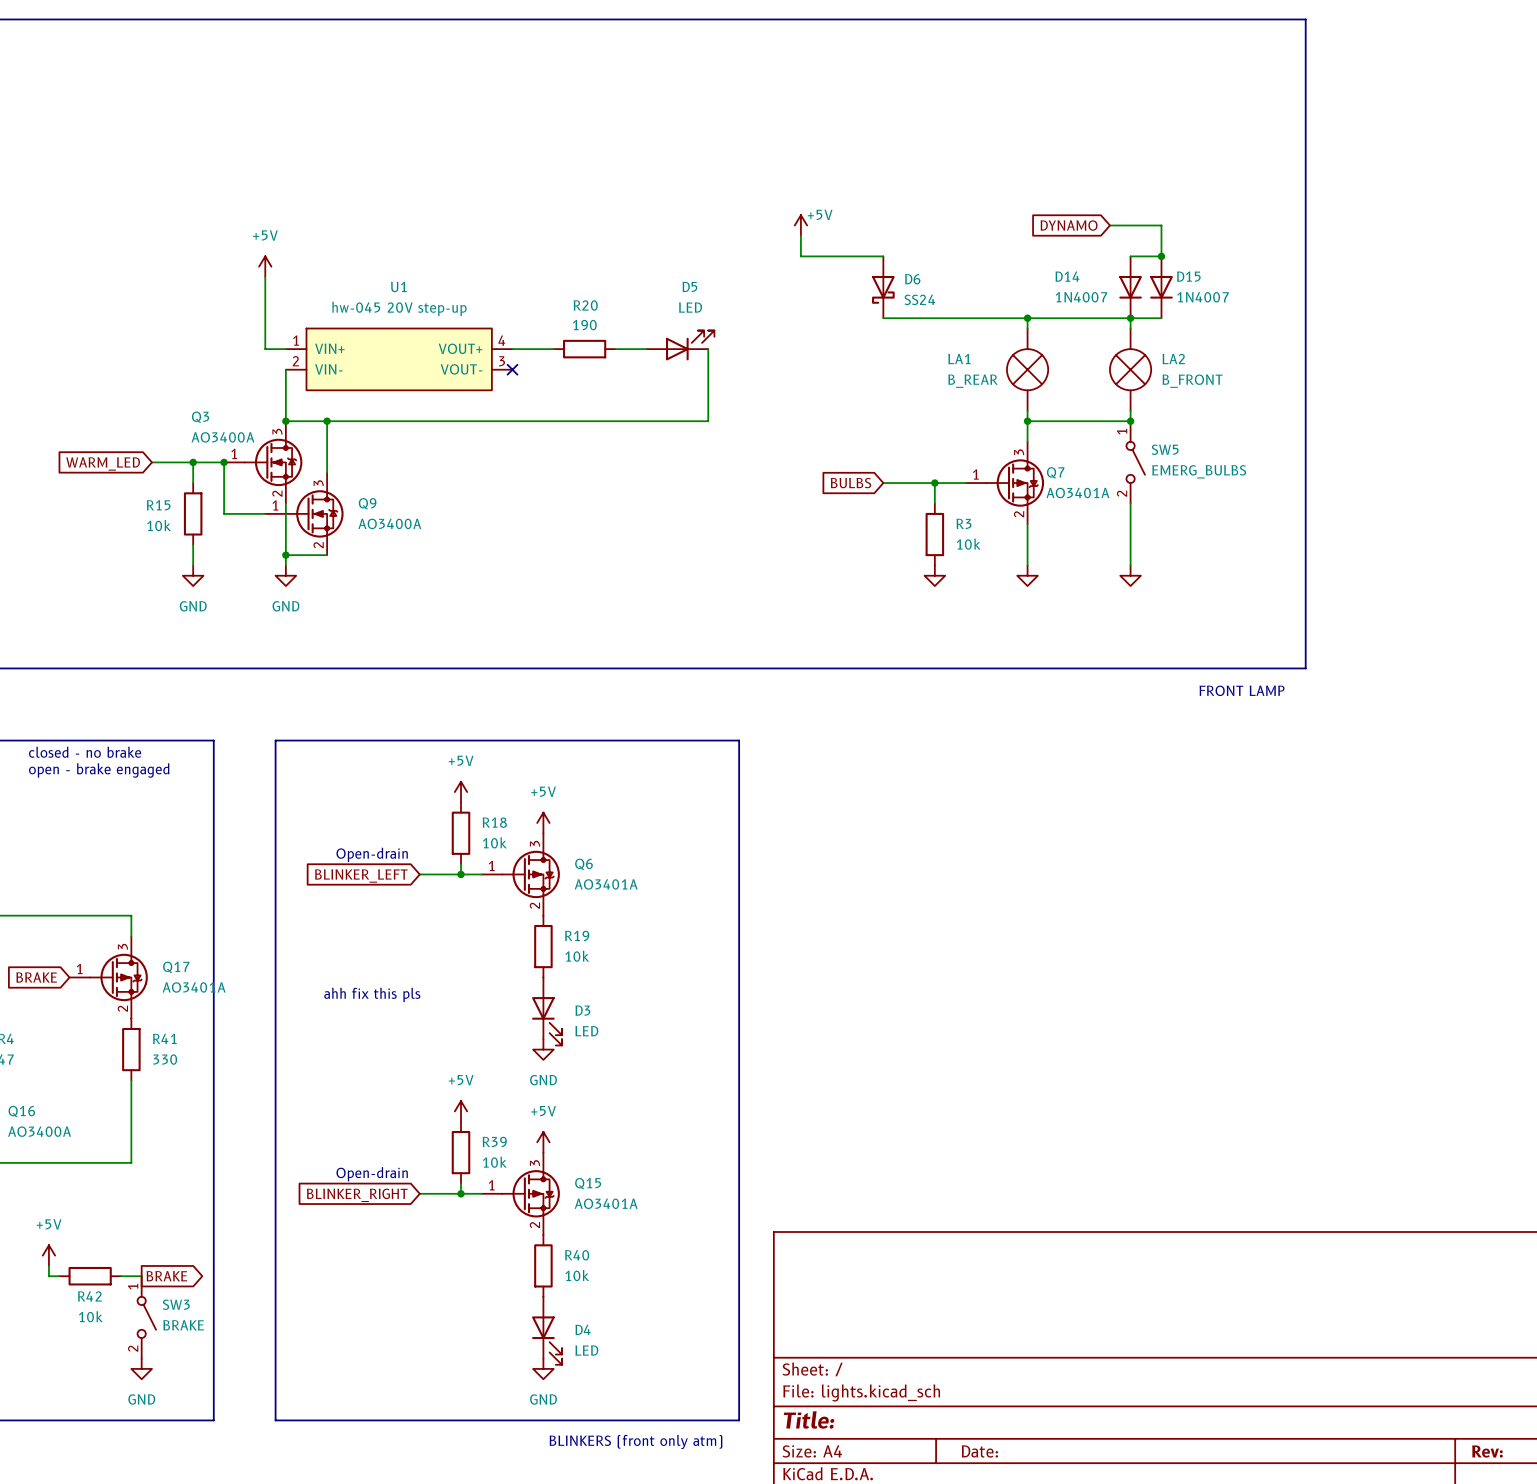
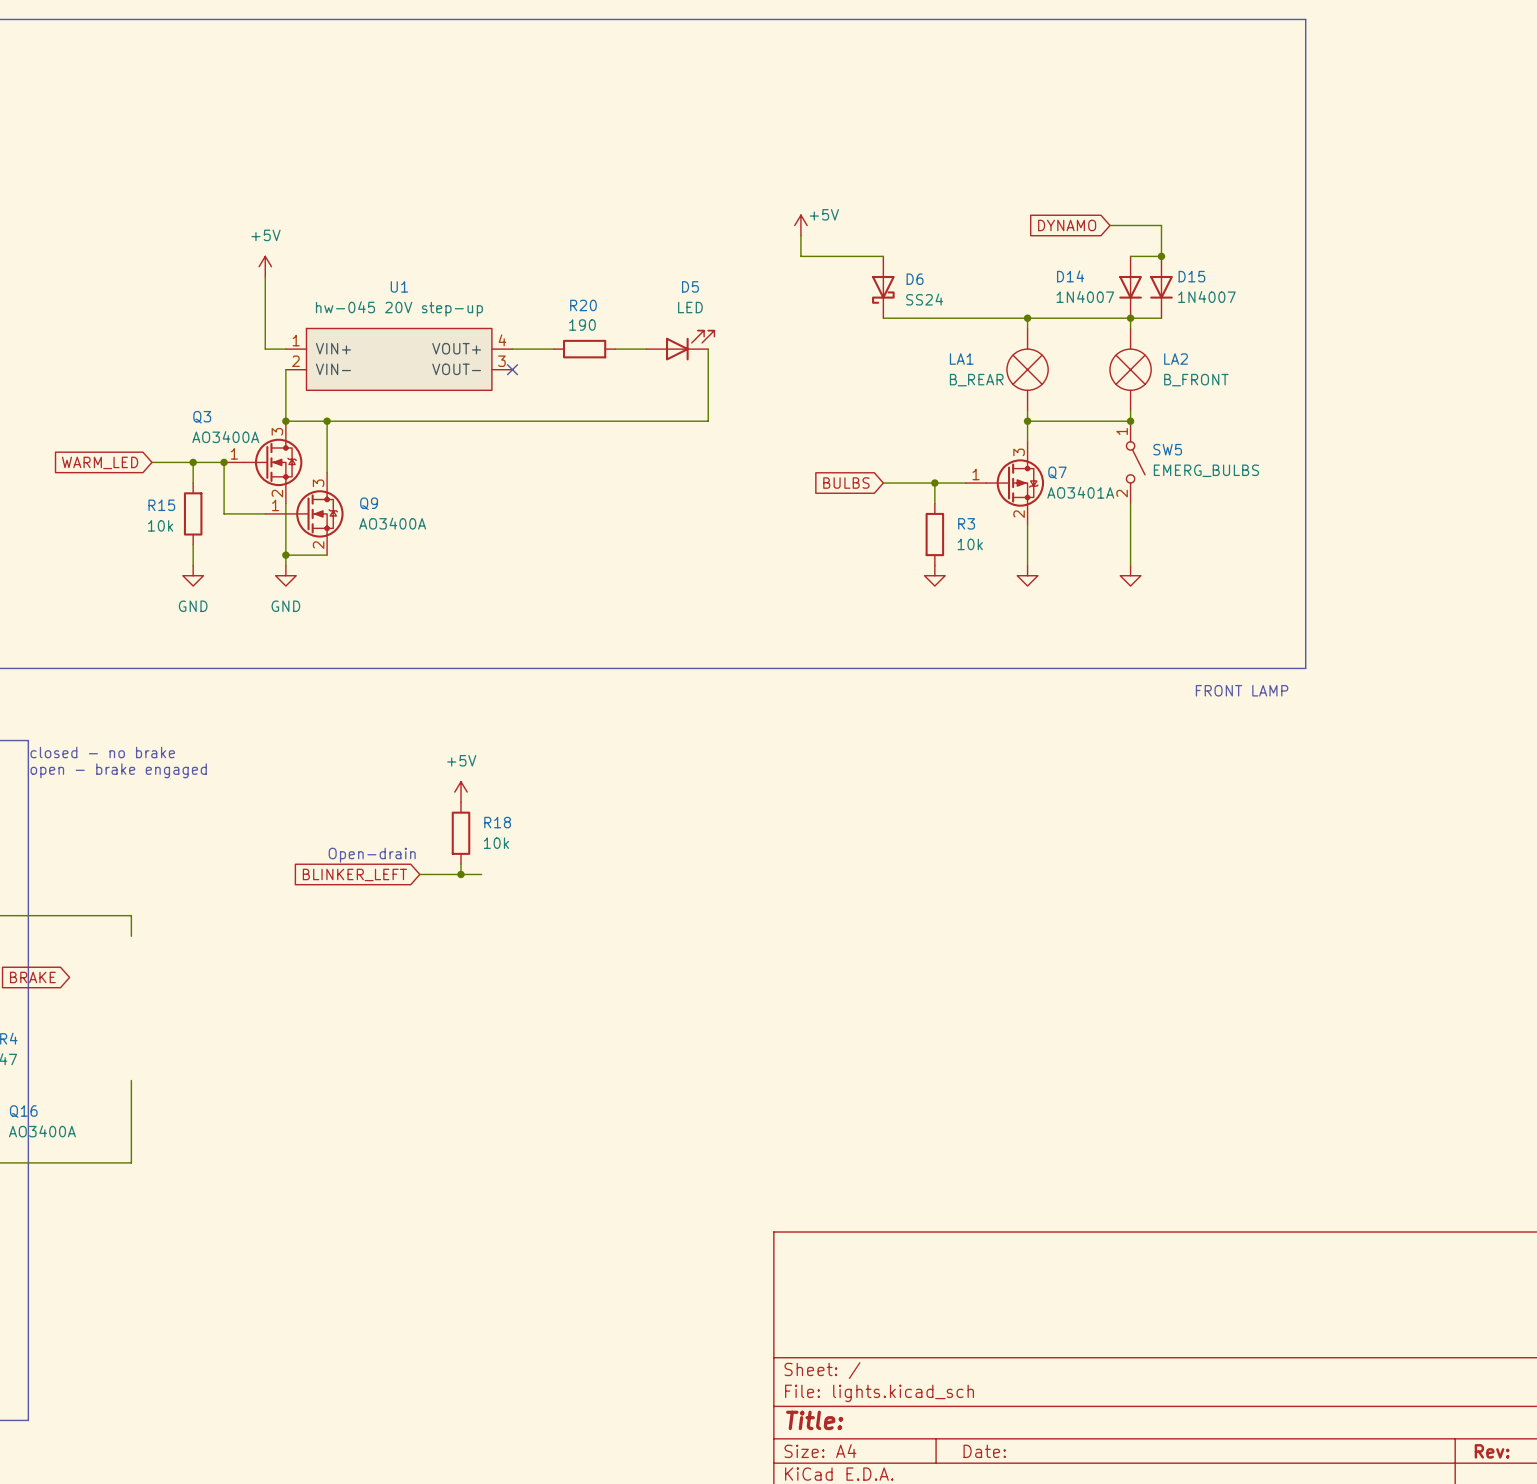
line: (28, 740) (213, 740) (213, 1420) (28, 1420) -> (28, 740) (28, 1420)
line: (275, 740) (739, 740) (739, 1420) (275, 1420) (275, 740) -> none
power symbol: +5V (543, 822) -> none
Q6: AO3401A (520, 874) -> none
R19: 10k (543, 946) -> none
Q17: AO3401A (108, 977) -> none
text: ahh fix this pls (372, 994) -> none
D3: LED (547, 1011) -> none
R41: 330 (131, 1049) -> none
power symbol: GND (543, 1049) -> none
power symbol: +5V (461, 1111) -> none
power symbol: +5V (543, 1142) -> none
R39: 10k (461, 1152) -> none
text: Open-drain (372, 1174) -> none
wire: (461, 1183) (461, 1193) -> none
wire: (419, 1193) (481, 1193) -> none
junction: (461, 1193) -> none
Q15: AO3401A (520, 1193) -> none
global label: BLINKER_RIGHT (357, 1195) -> none
power symbol: +5V (48, 1255) -> none
wire: (48, 1265) (48, 1276) (59, 1276) -> none
R40: 10k (543, 1265) -> none
R42: 10k (90, 1276) -> none
wire: (121, 1276) (141, 1276) -> none
global label: BRAKE (166, 1276) -> none
SW3: BRAKE (146, 1317) -> none
D4: LED (547, 1330) -> none
power symbol: GND (141, 1368) -> none
power symbol: GND (543, 1368) -> none
text: BLINKERS (front only atm) (635, 1441) -> none

